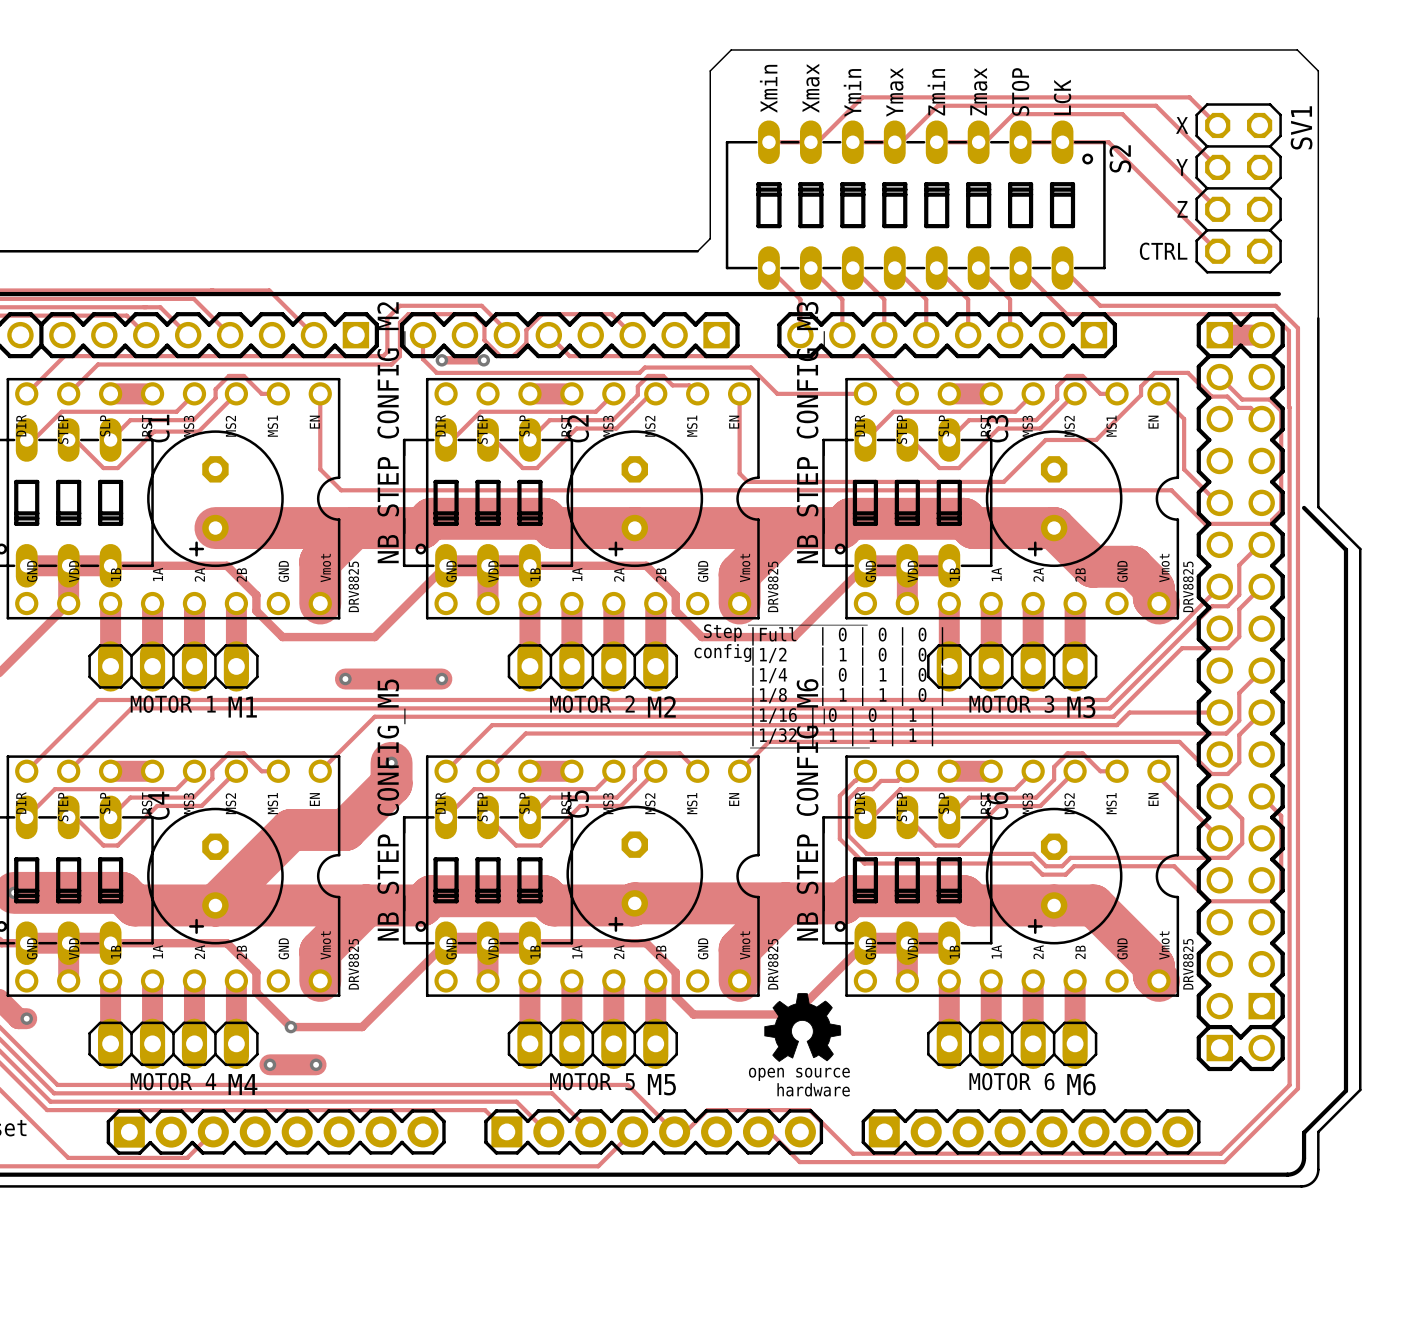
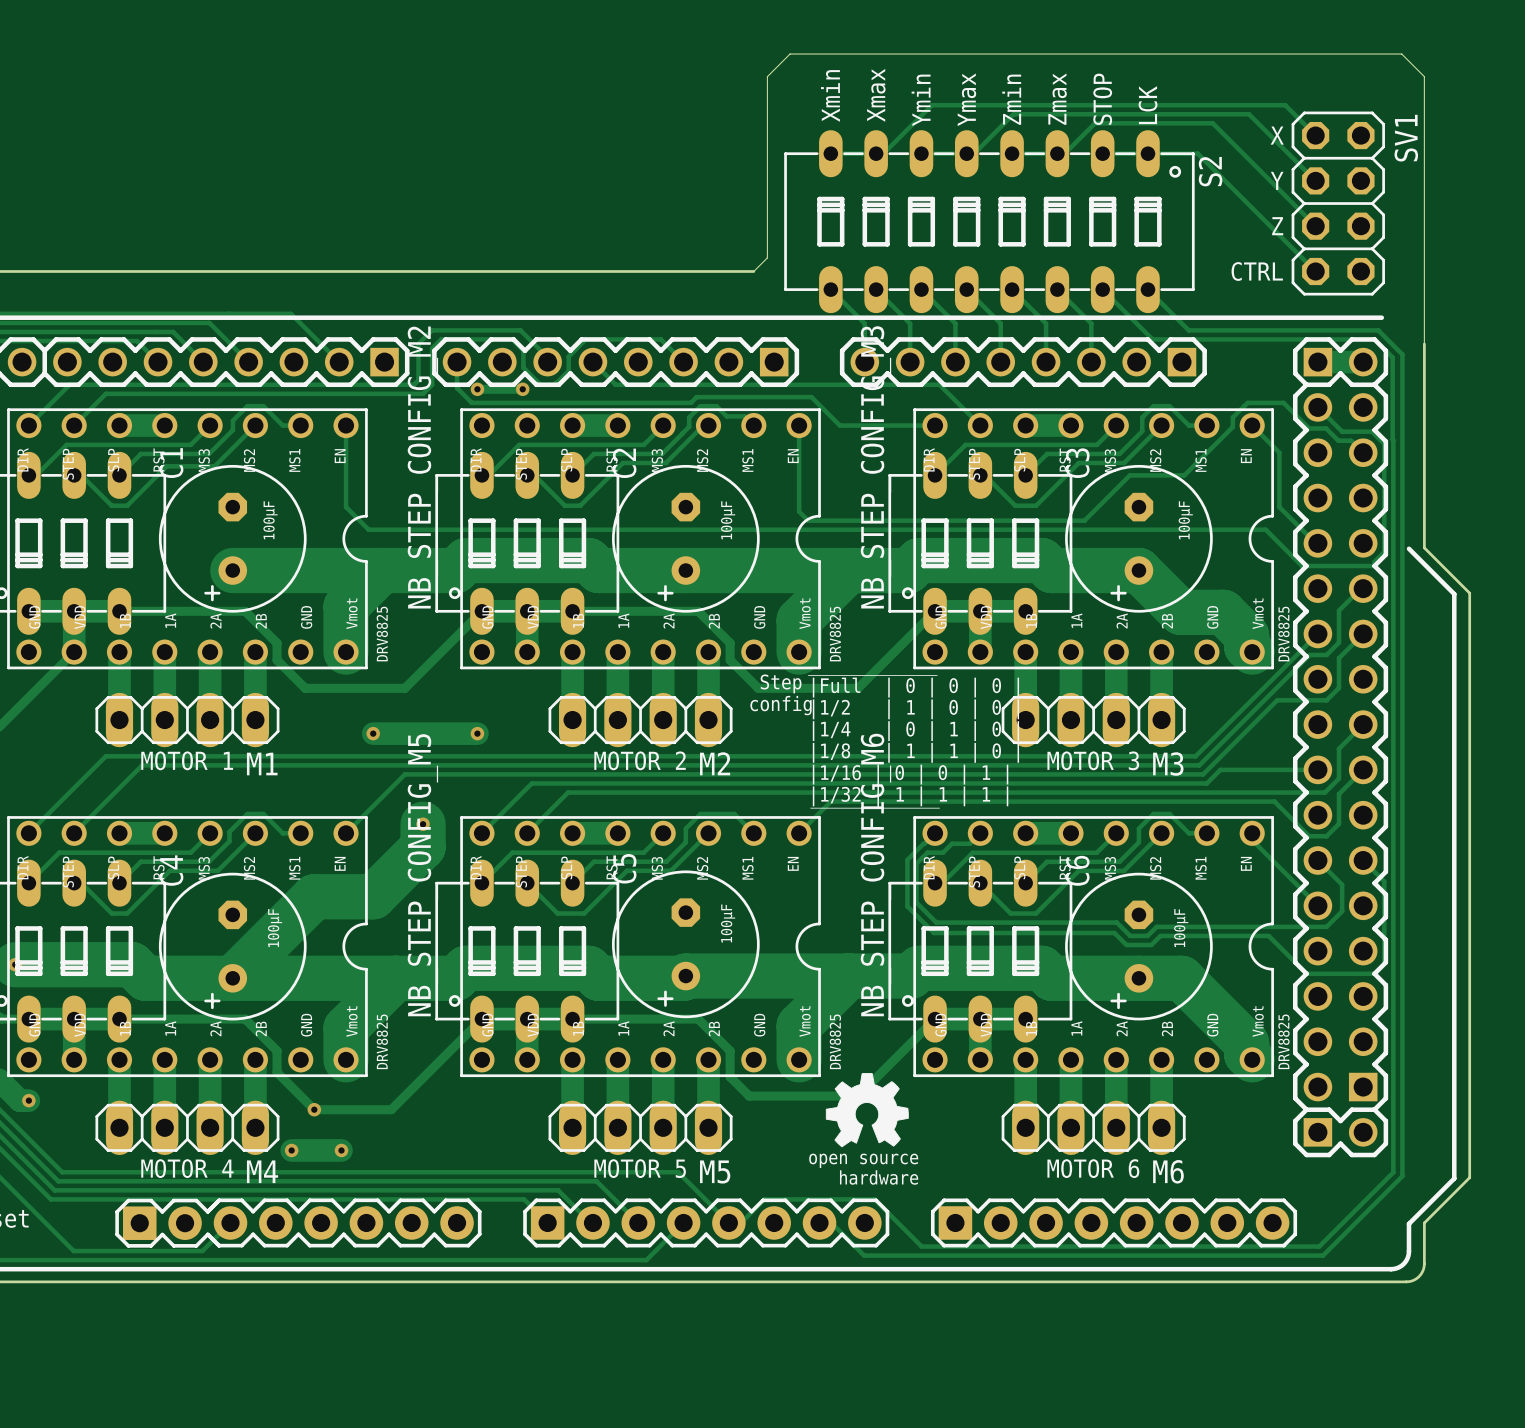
text: none -> 100µF (270, 520)
text: none -> 100µF (728, 520)
text: none -> 100µF (1185, 520)
text: none -> 100µF (728, 923)
text: none -> 100µF (275, 928)
text: none -> 100µF (1181, 928)

